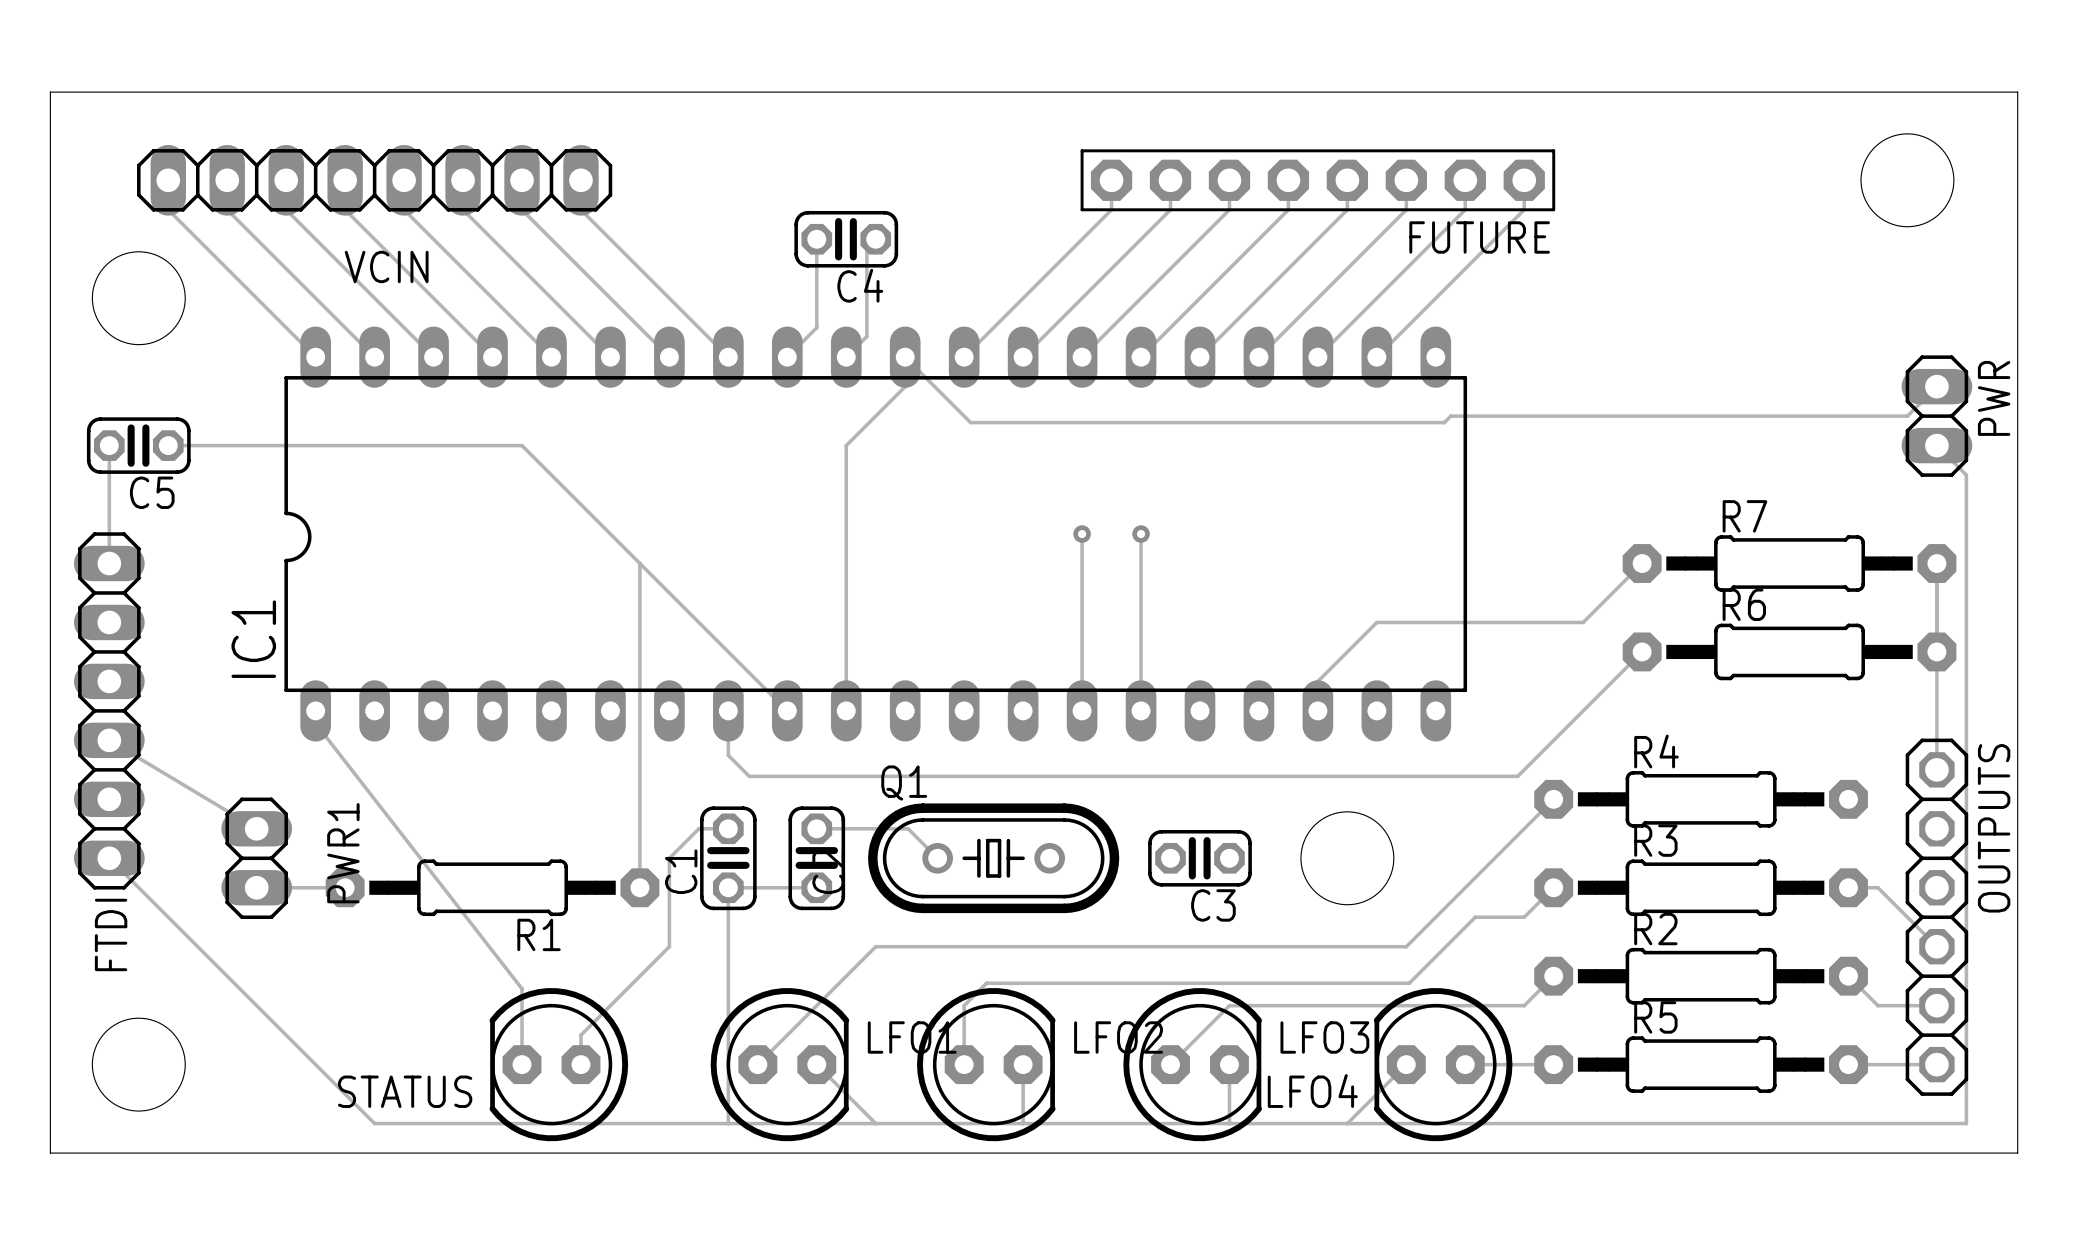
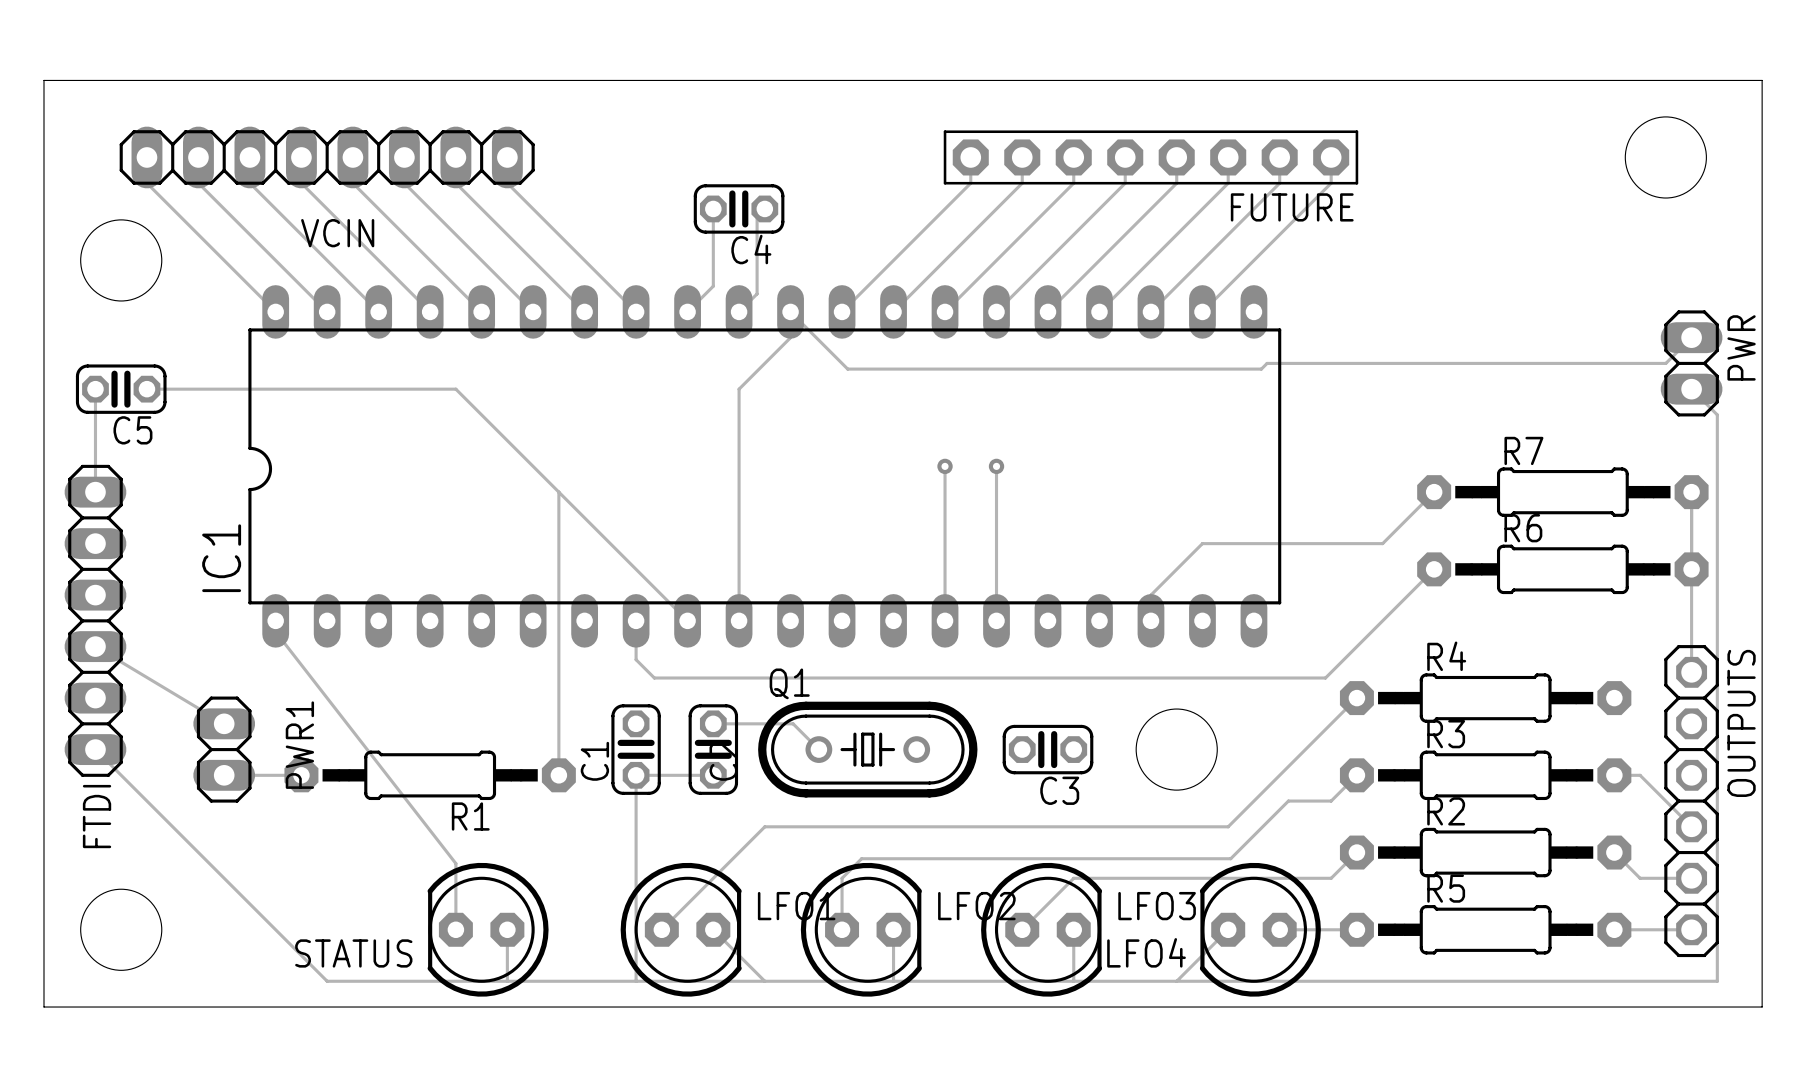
track: (728, 828) (698, 828) (669, 858) (669, 946) (580, 1035) (580, 1064) -> (507, 981) (507, 929)

